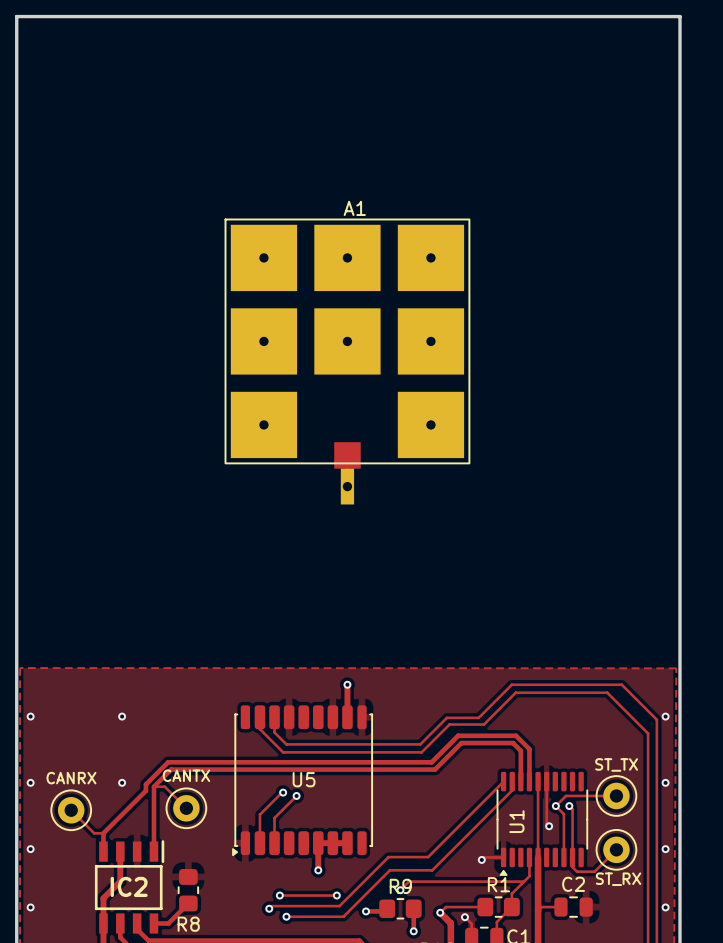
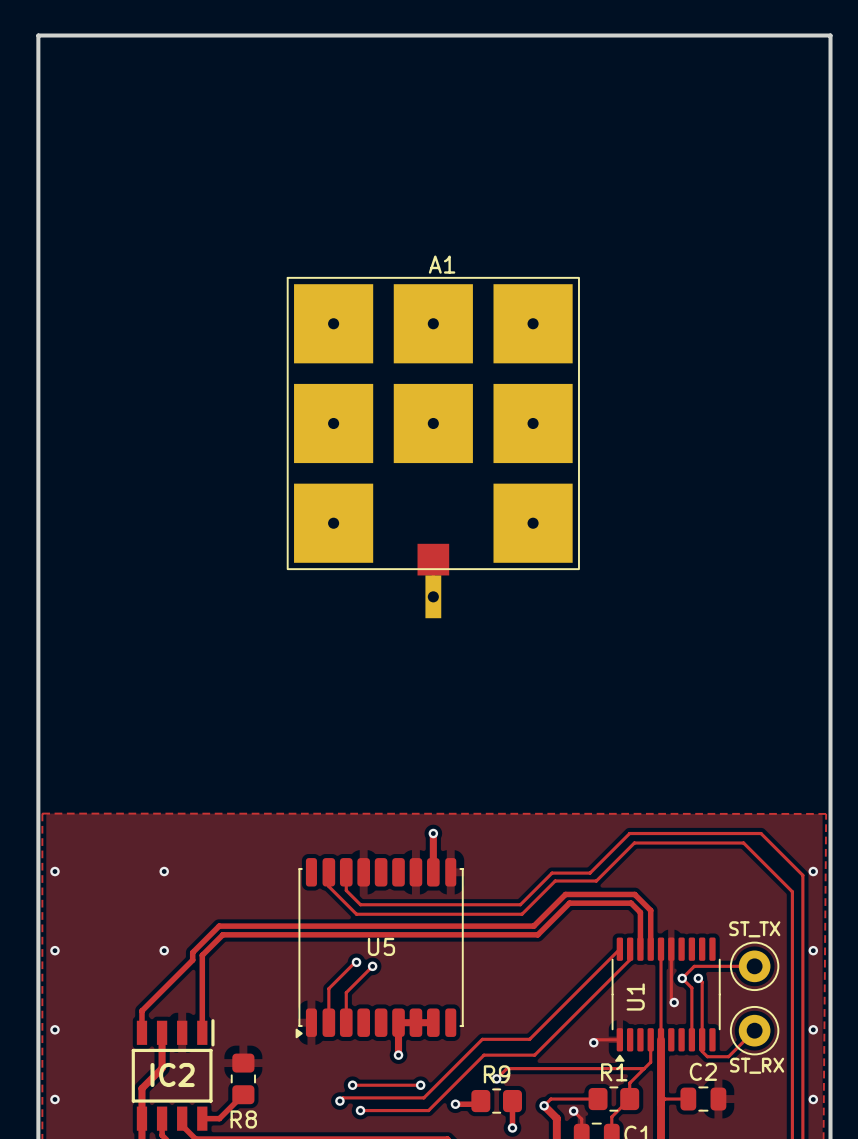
text: CANTX (186, 775) -> none
text: CANRX (71, 778) -> none
track: (153, 786) (164, 786) (186, 808) -> none
part: (186, 808) -> none
track: (71, 810) (94, 833) (103, 833) -> none
part: (71, 810) -> none

